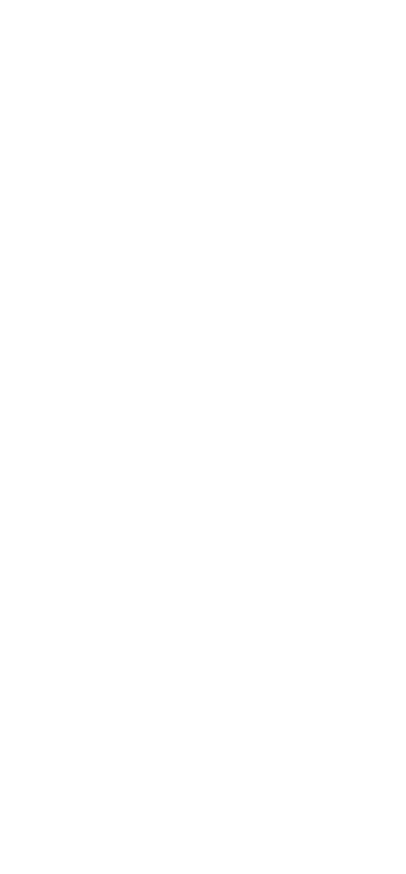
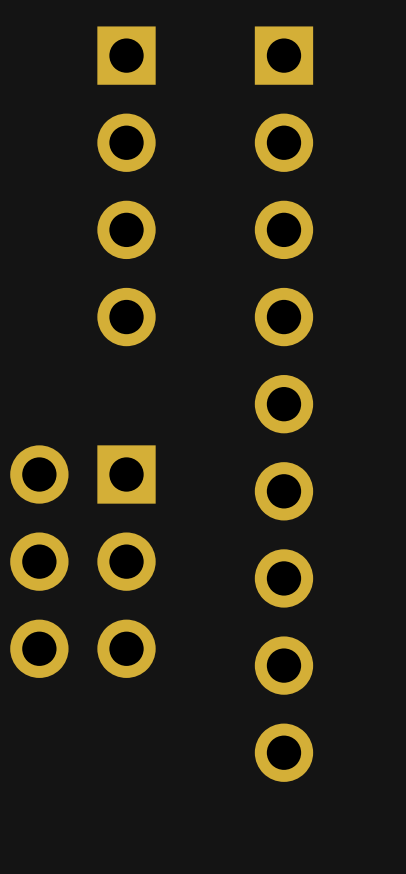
part: none -> (126, 186)
part: none -> (283, 404)
part: none -> (82, 561)

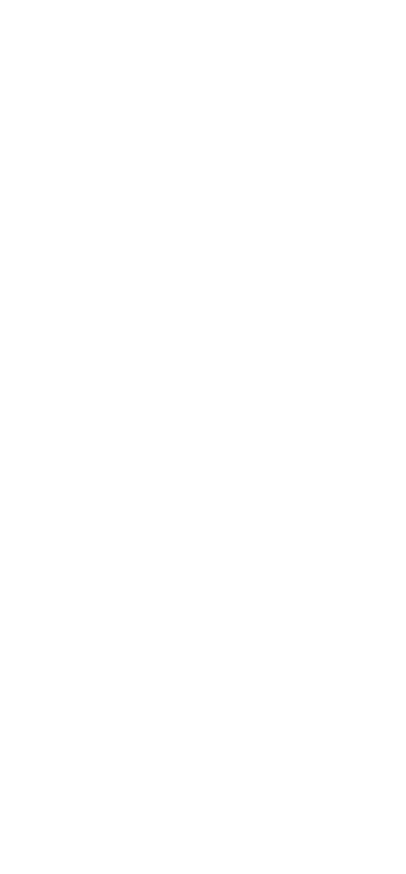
part: (126, 186) -> none
part: (283, 404) -> none
part: (82, 561) -> none

